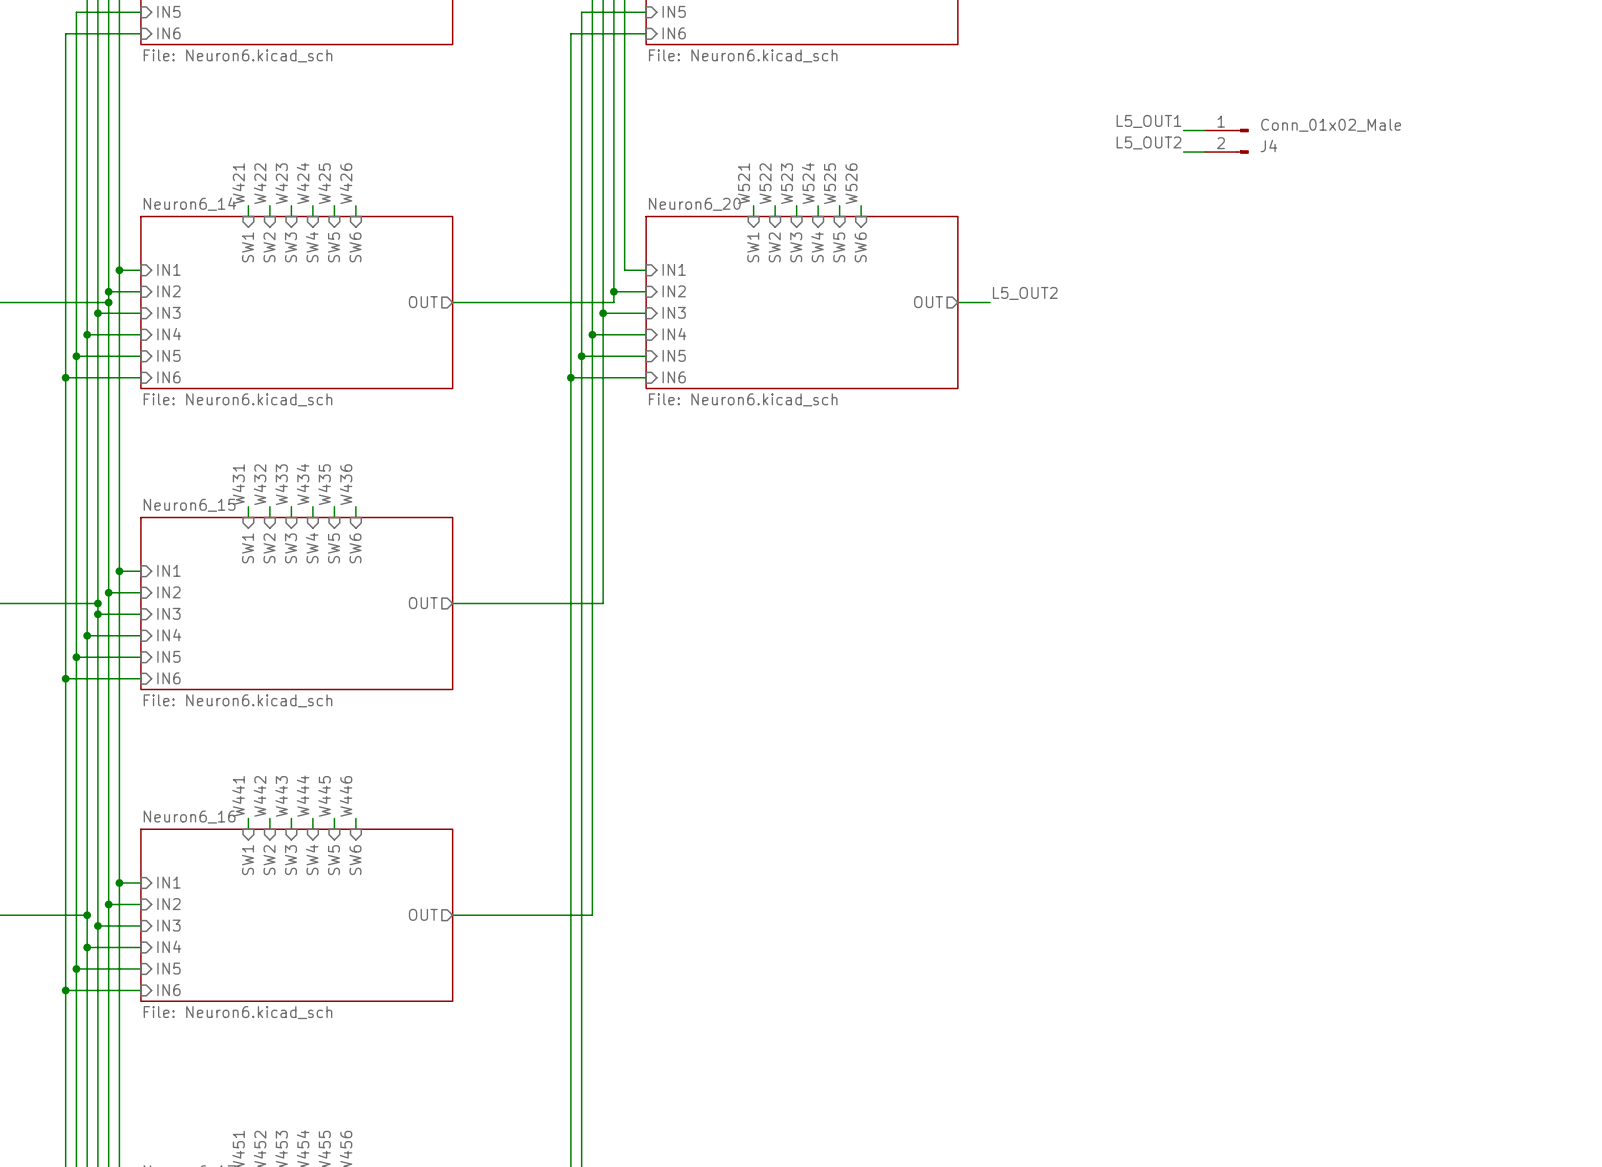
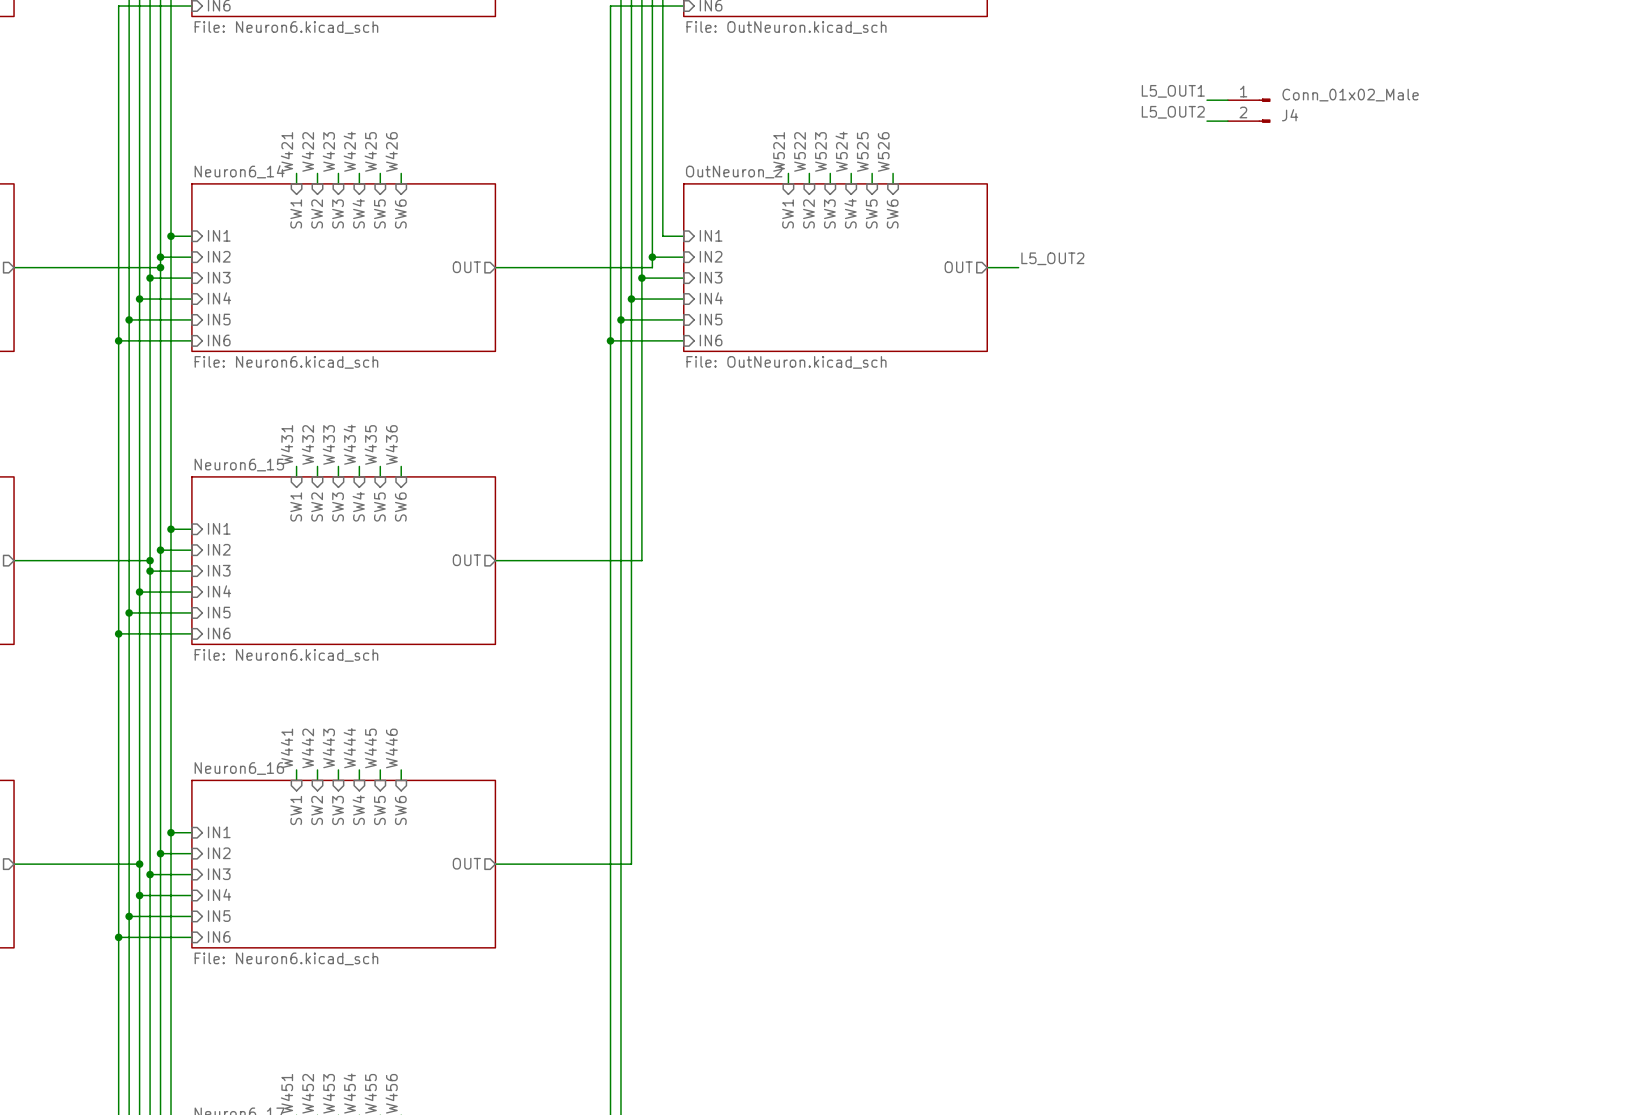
sheet value: File: Neuron6.kicad_sch (743, 55) -> File: OutNeuron.kicad_sch (786, 27)
sheet Neuron6_20 name: Neuron6_20 (694, 204) -> OutNeuron_2 (734, 172)
sheet Neuron6_20 value: File: Neuron6.kicad_sch (743, 399) -> File: OutNeuron.kicad_sch (786, 362)

